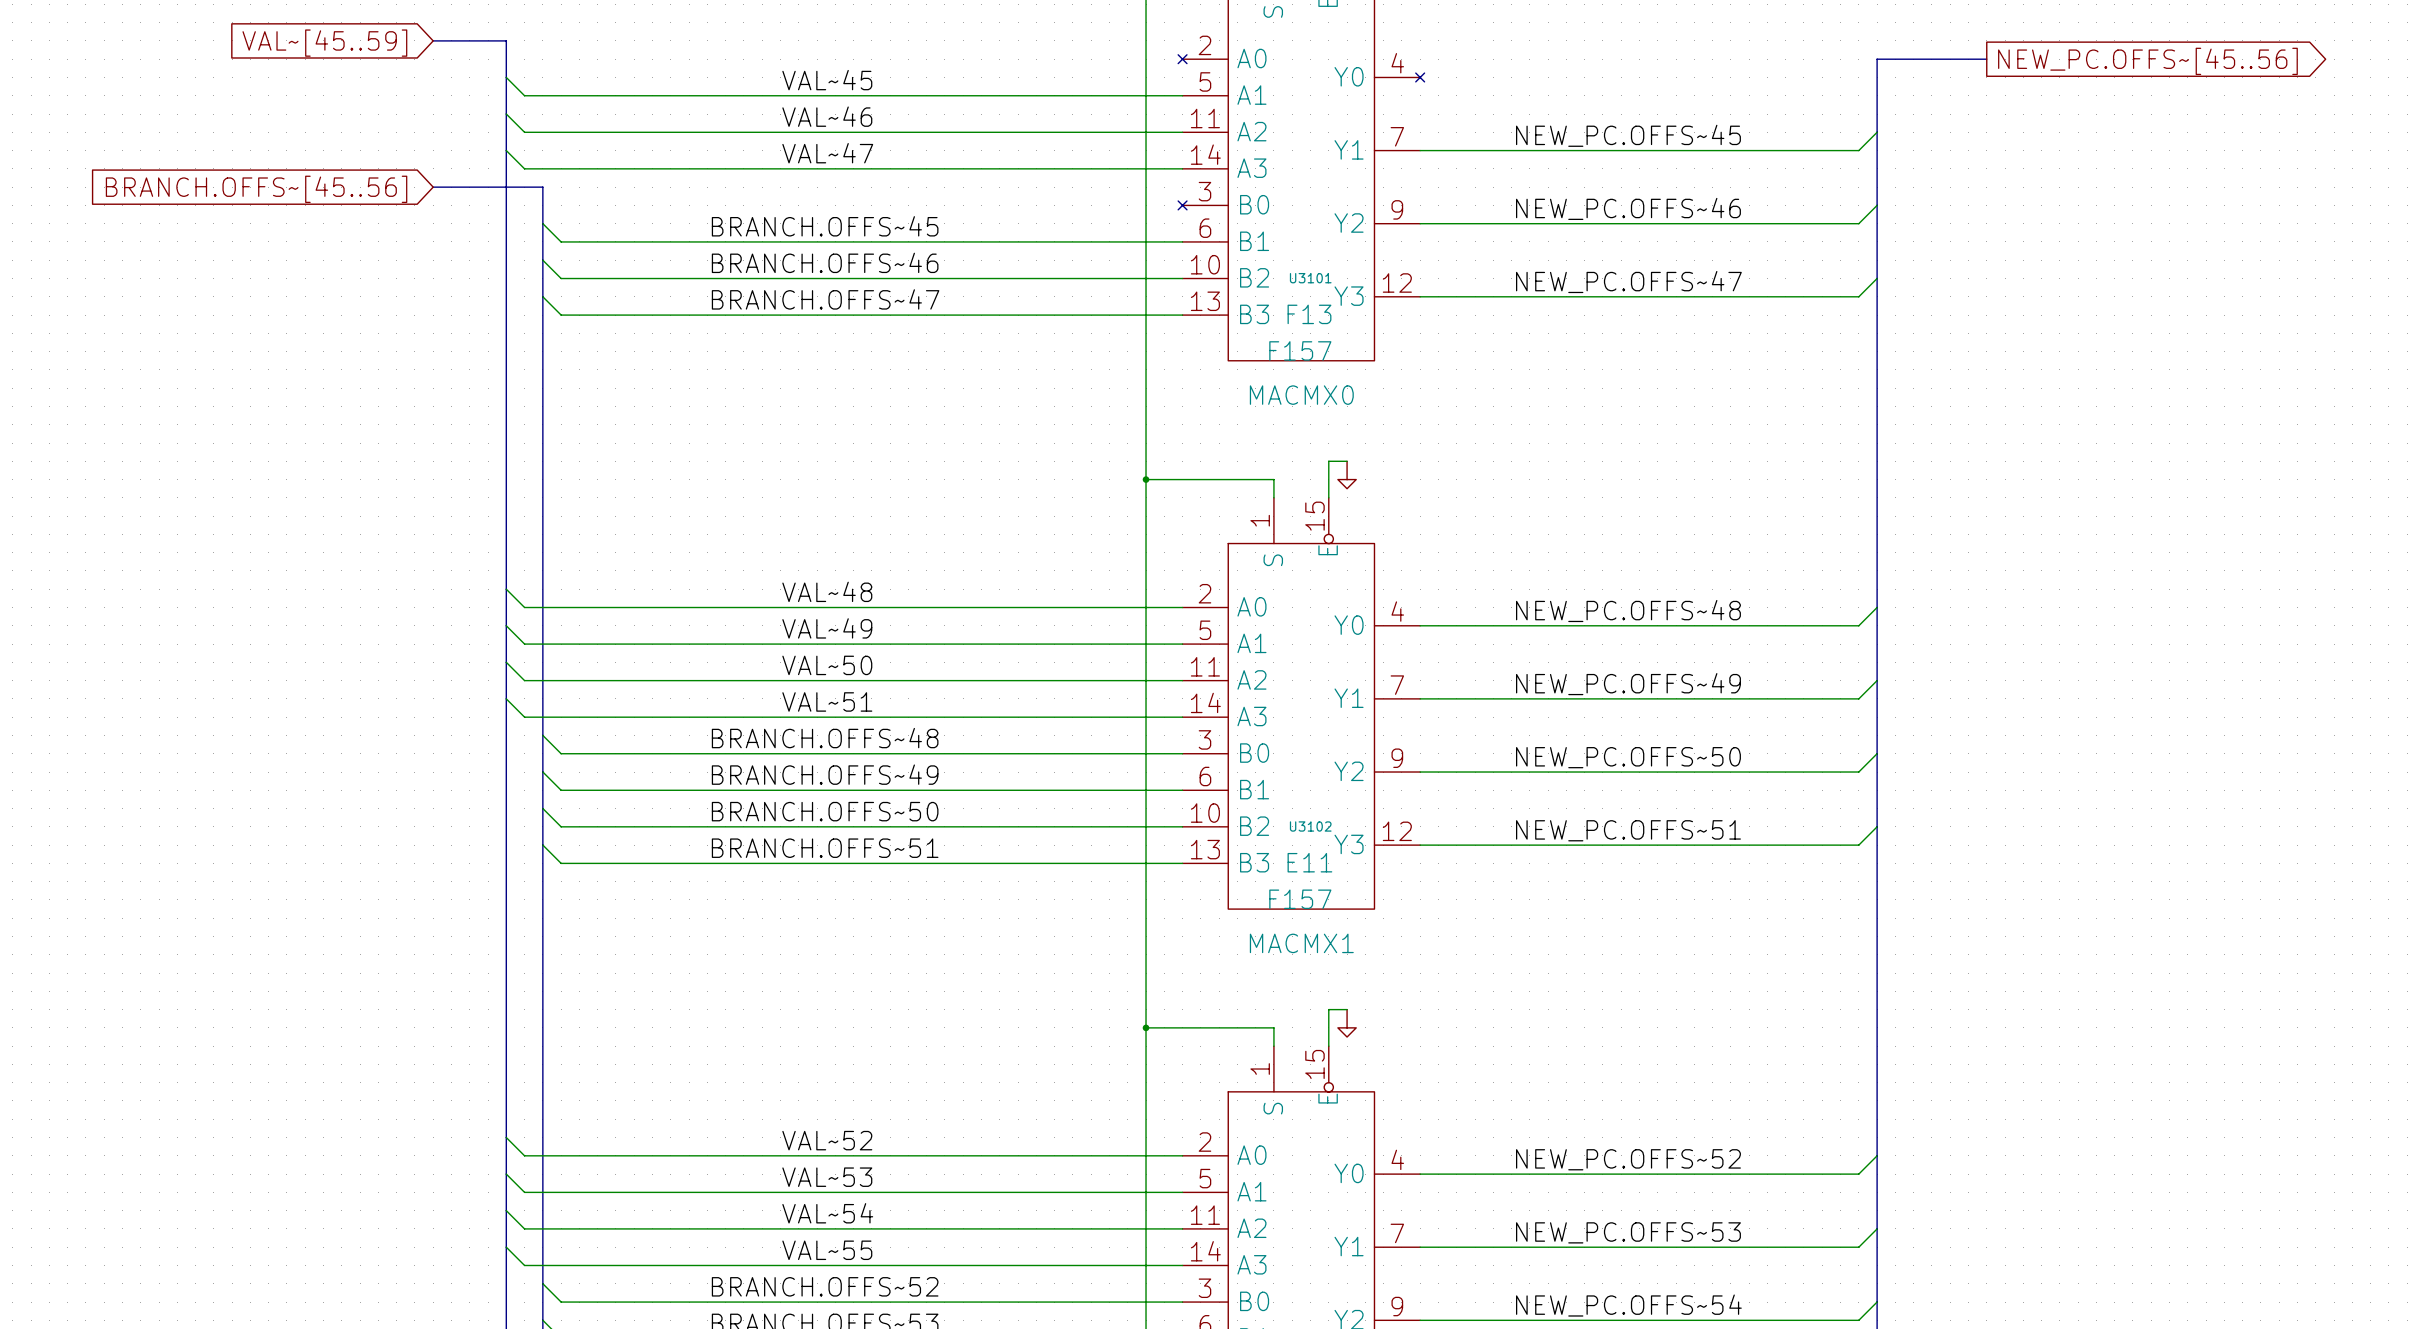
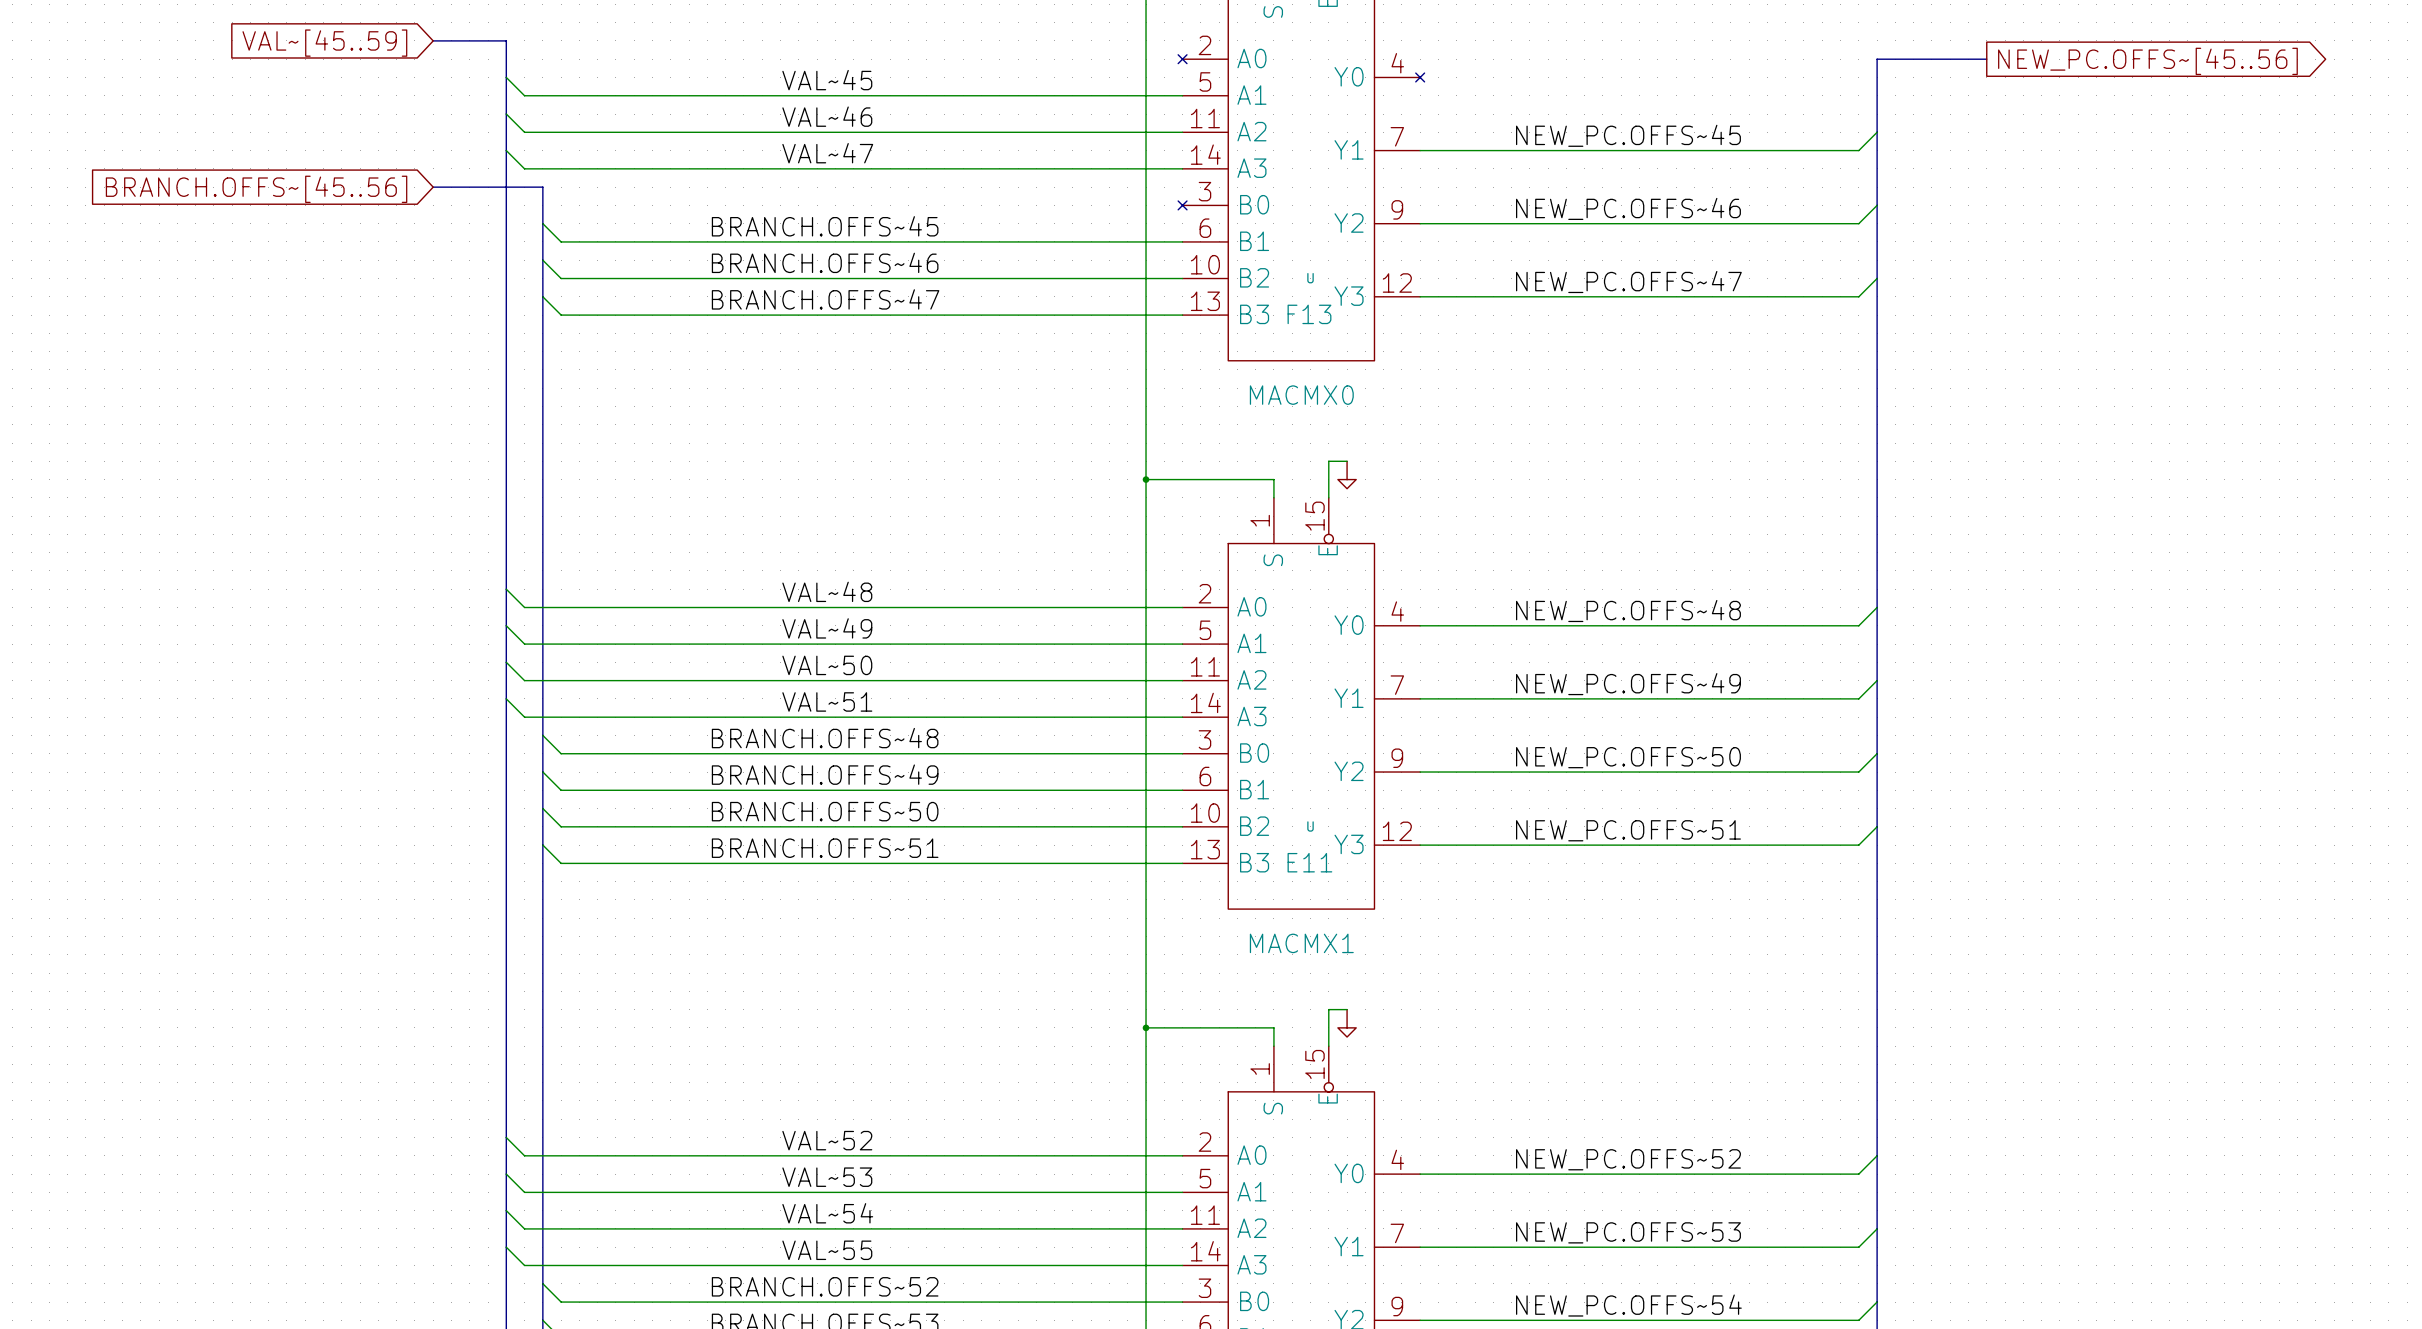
U3101 name: U3101 (1310, 278) -> U (1310, 278)
U3101 value: F157 (1300, 350) -> none
U3102 name: U3102 (1310, 826) -> U (1310, 826)
U3102 value: F157 (1300, 899) -> none

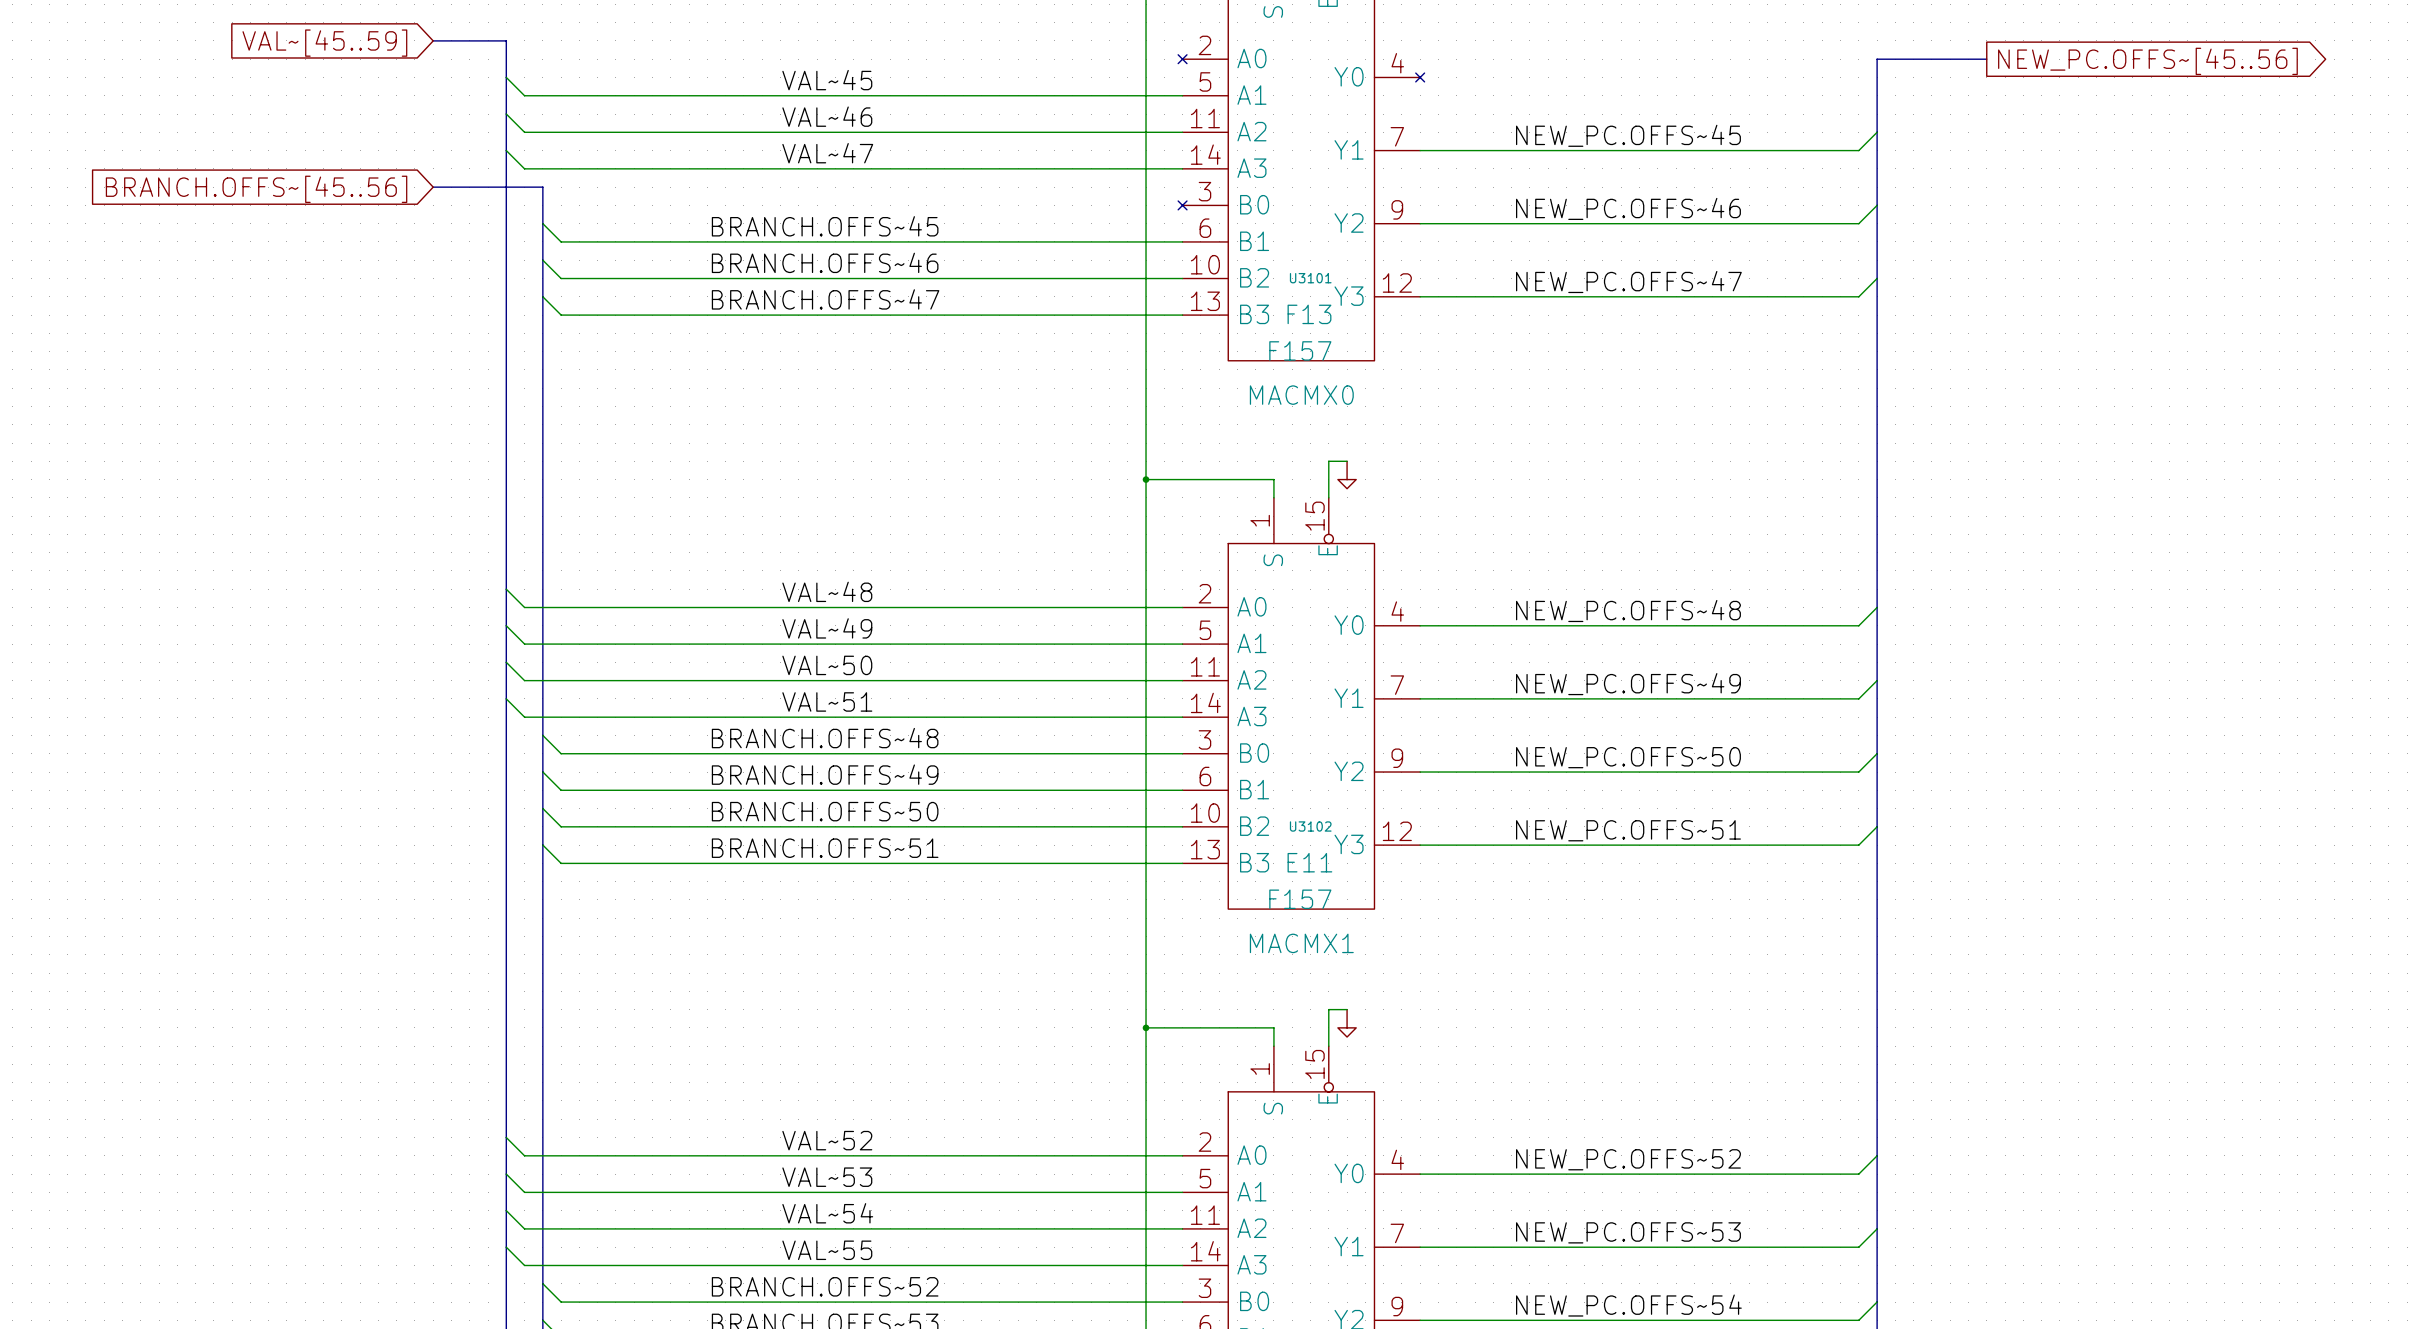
U name: U (1310, 278) -> U3101 (1310, 278)
U value: none -> F157 (1300, 350)
U name: U (1310, 826) -> U3102 (1310, 826)
U value: none -> F157 (1300, 899)

